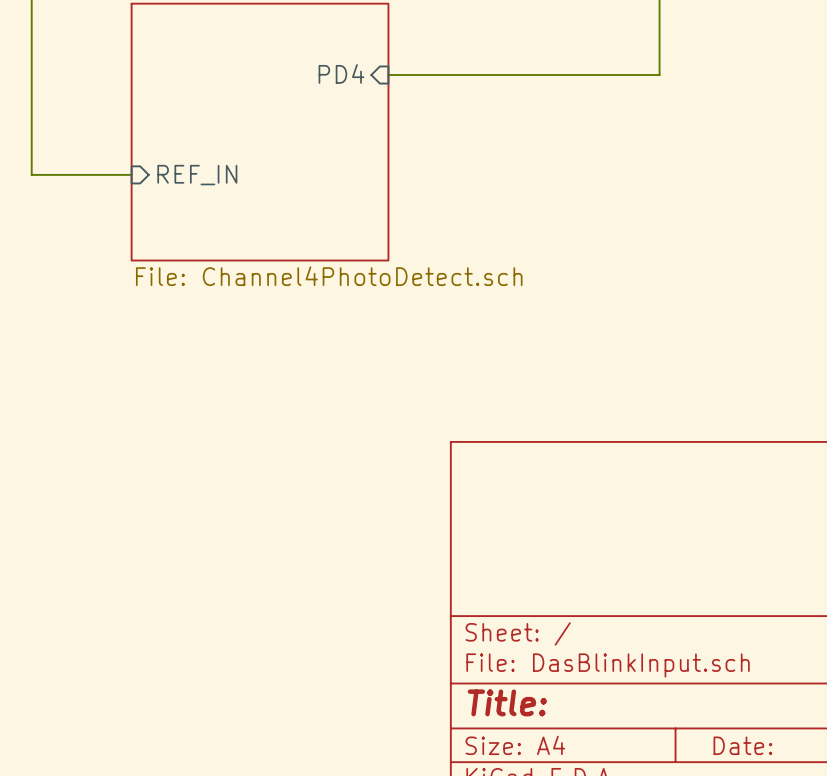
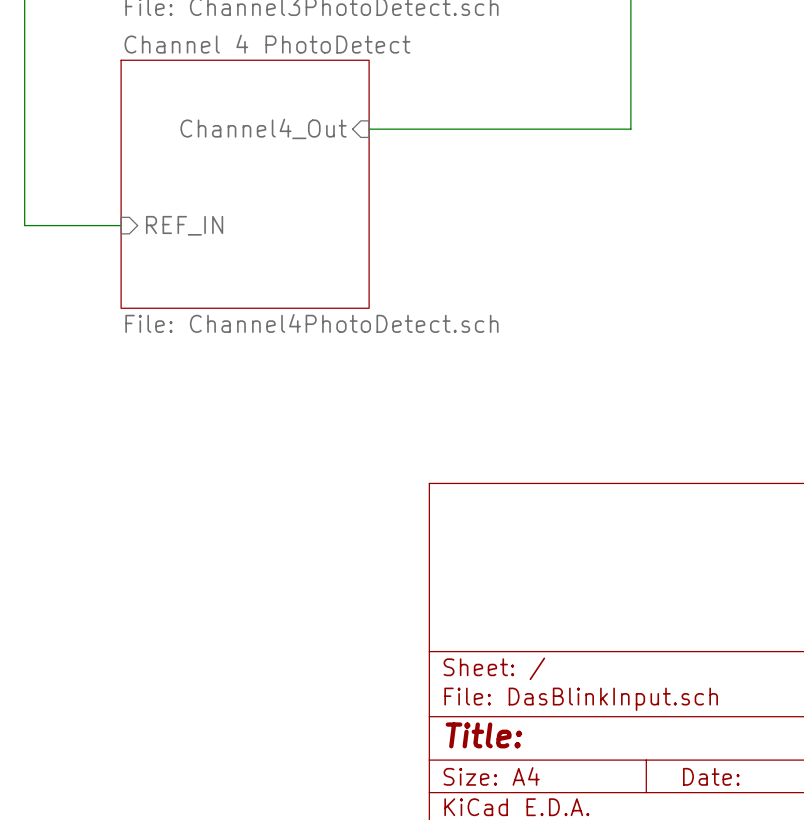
sheet pin: PD4 (341, 73) -> Channel4_Out (263, 128)

